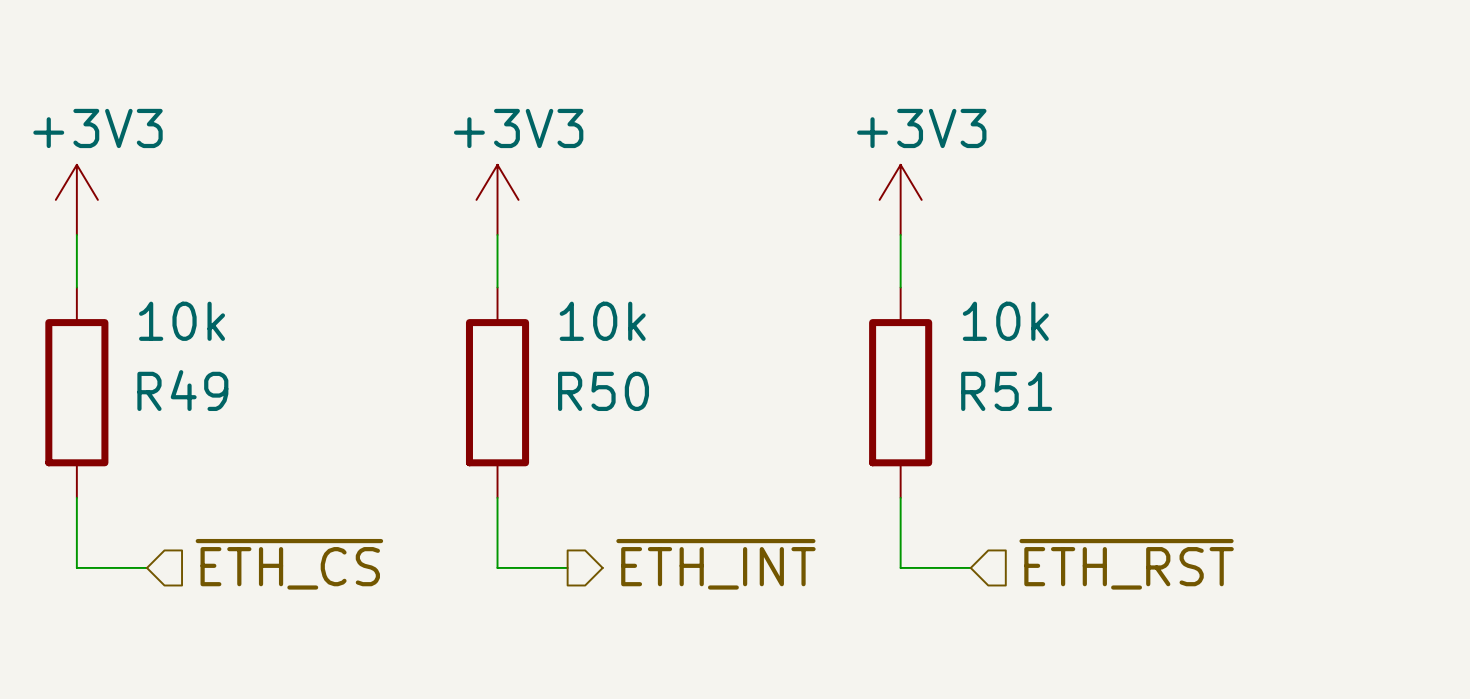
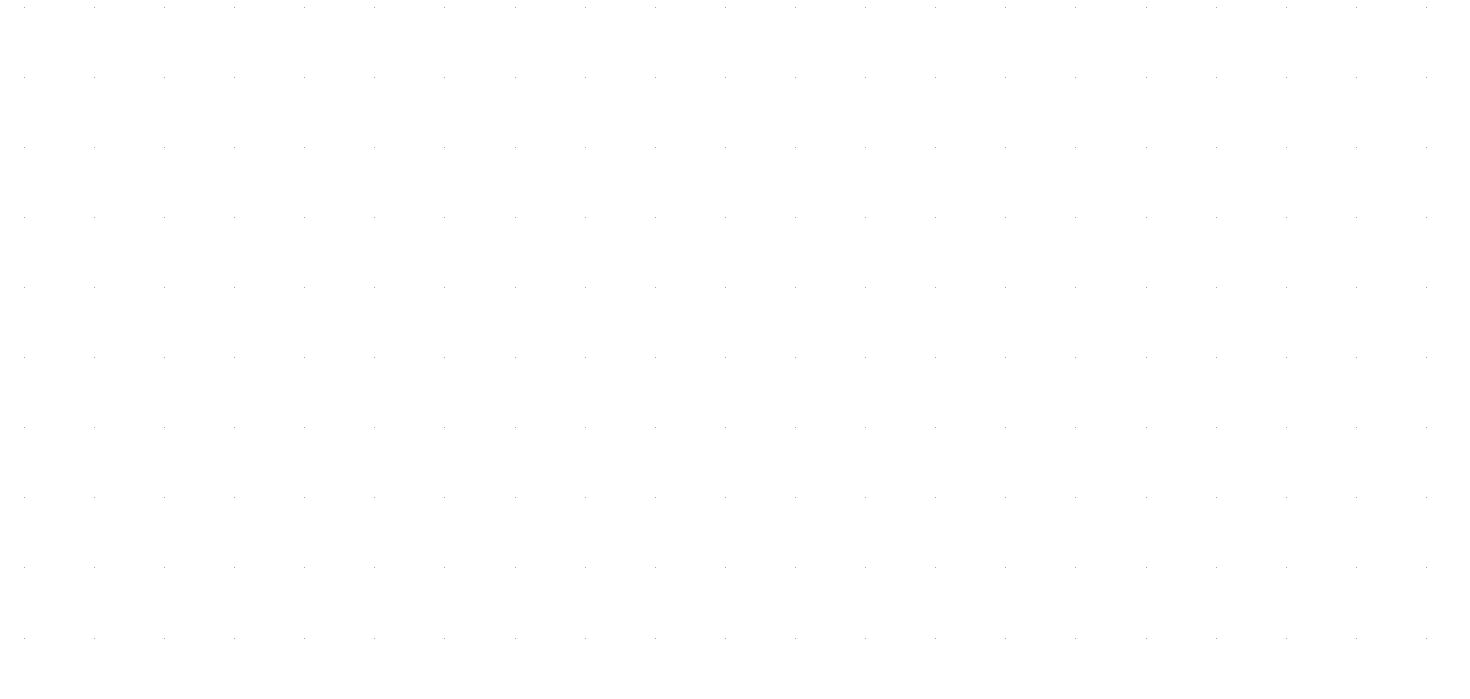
power symbol: +3V3 (76, 199) -> none
power symbol: +3V3 (497, 199) -> none
power symbol: +3V3 (900, 199) -> none
wire: (76, 234) (76, 287) -> none
wire: (497, 234) (497, 287) -> none
wire: (900, 234) (900, 287) -> none
R49: 10k (76, 392) -> none
R50: 10k (497, 392) -> none
R51: 10k (900, 392) -> none
wire: (76, 497) (76, 567) (146, 567) -> none
wire: (497, 497) (497, 567) (567, 567) -> none
wire: (900, 497) (900, 567) (970, 567) -> none
hierarchical label: ~{ETH_CS} (289, 564) -> none
hierarchical label: ~{ETH_INT} (715, 564) -> none
hierarchical label: ~{ETH_RST} (1126, 564) -> none

